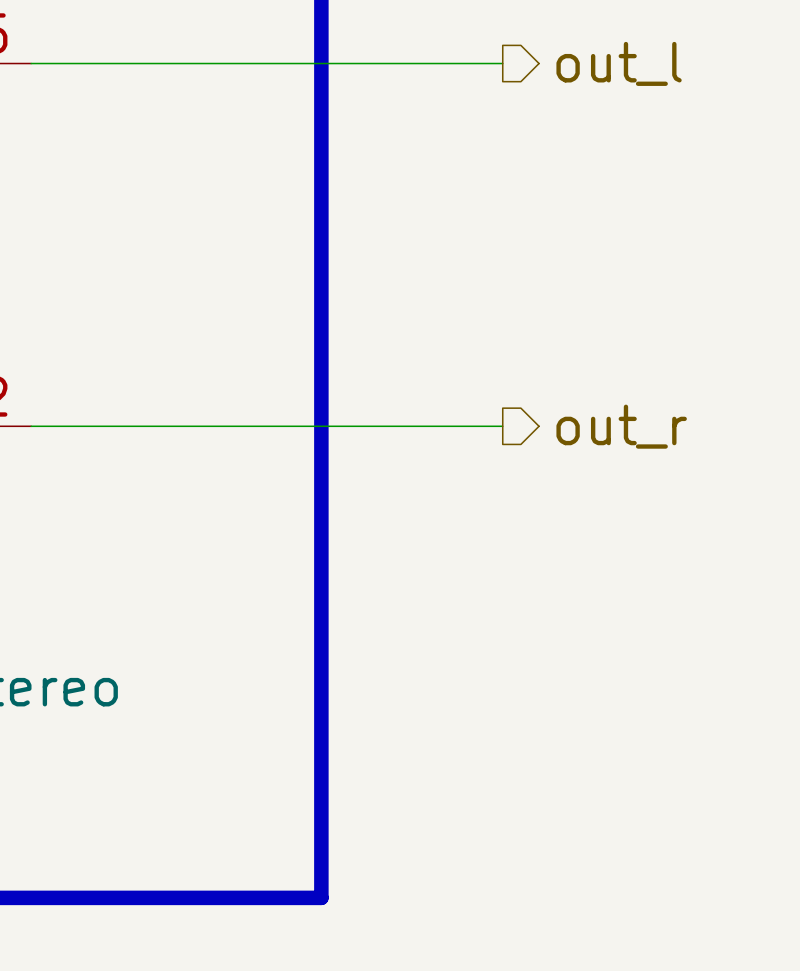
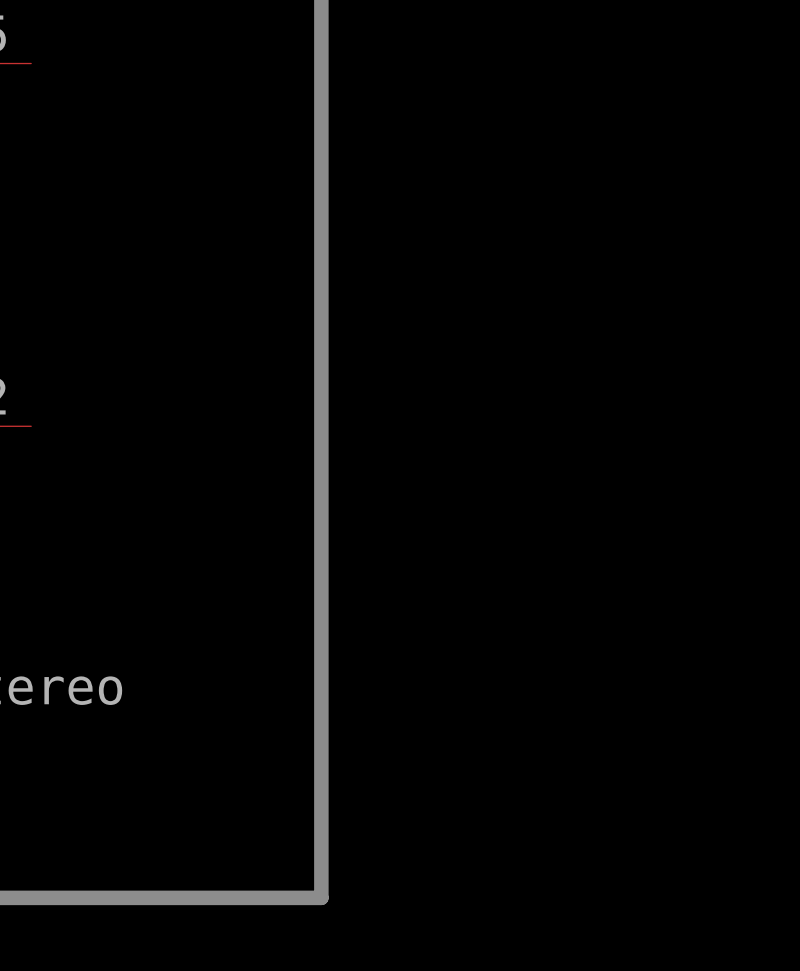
wire: (31, 63) (502, 63) -> none
hierarchical label: out_l (619, 63) -> none
wire: (31, 426) (502, 426) -> none
hierarchical label: out_r (621, 426) -> none

